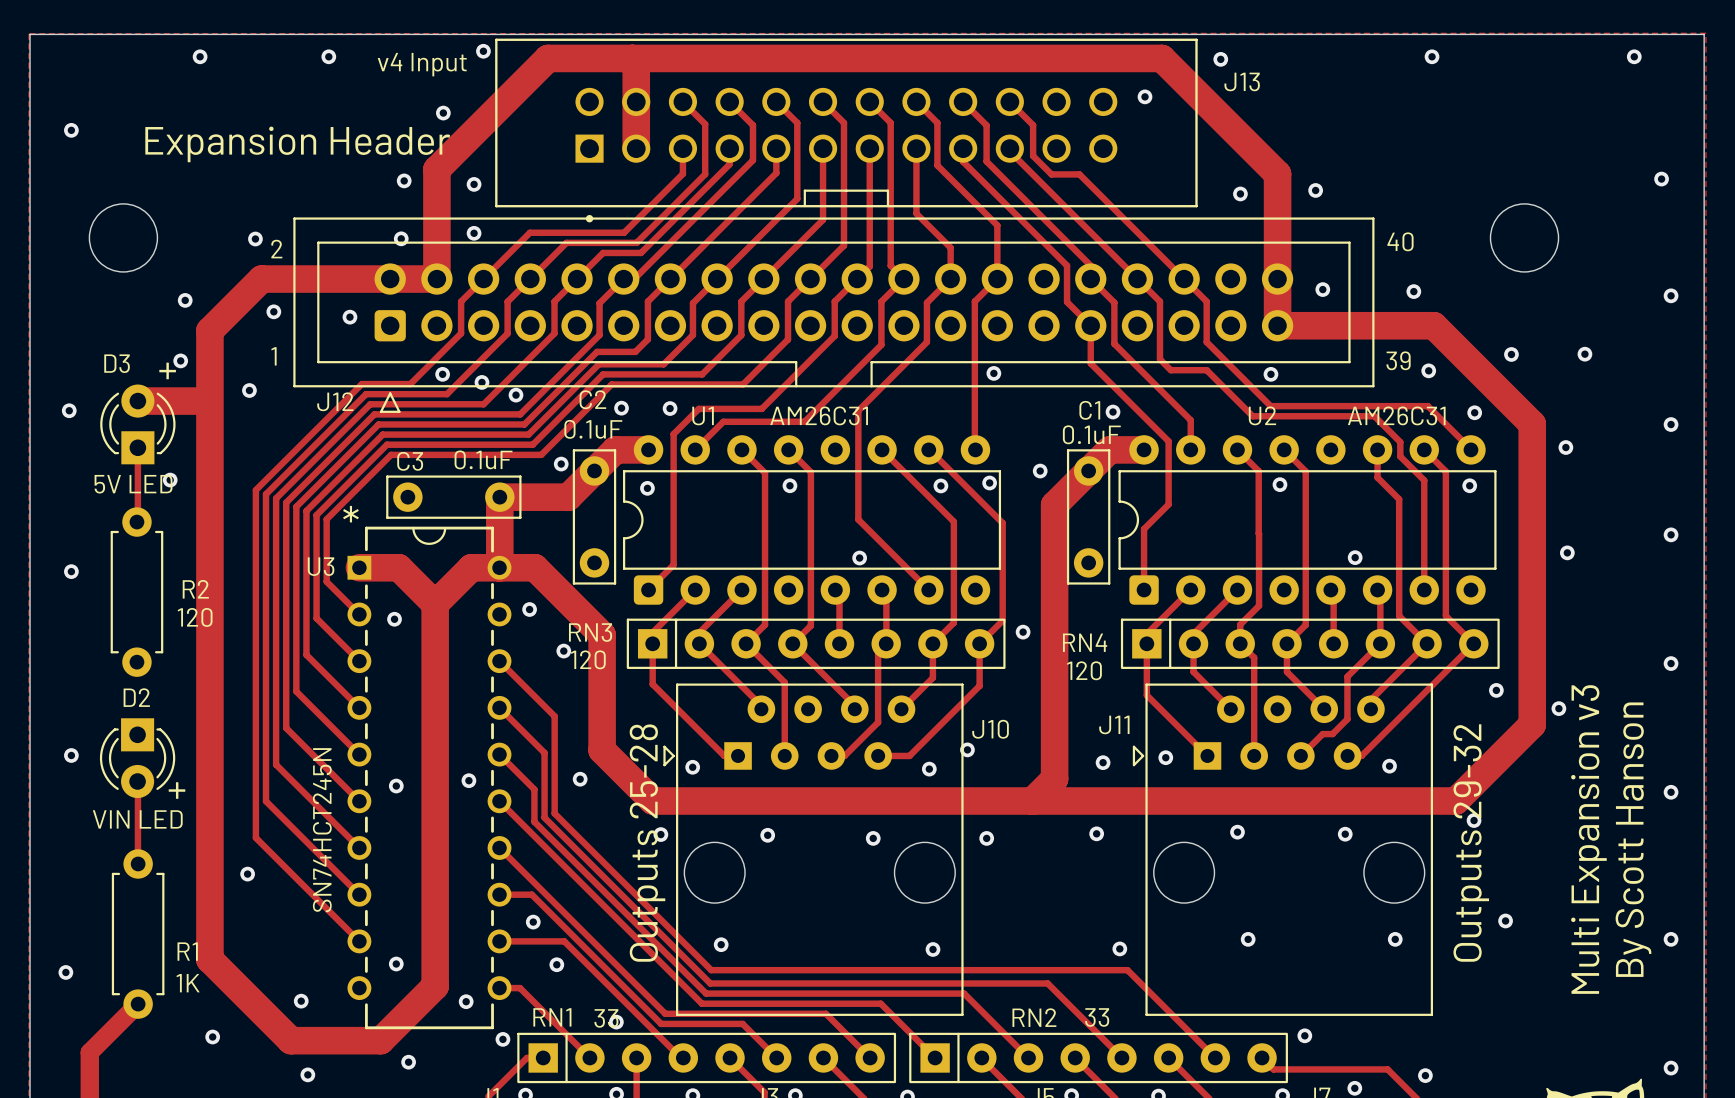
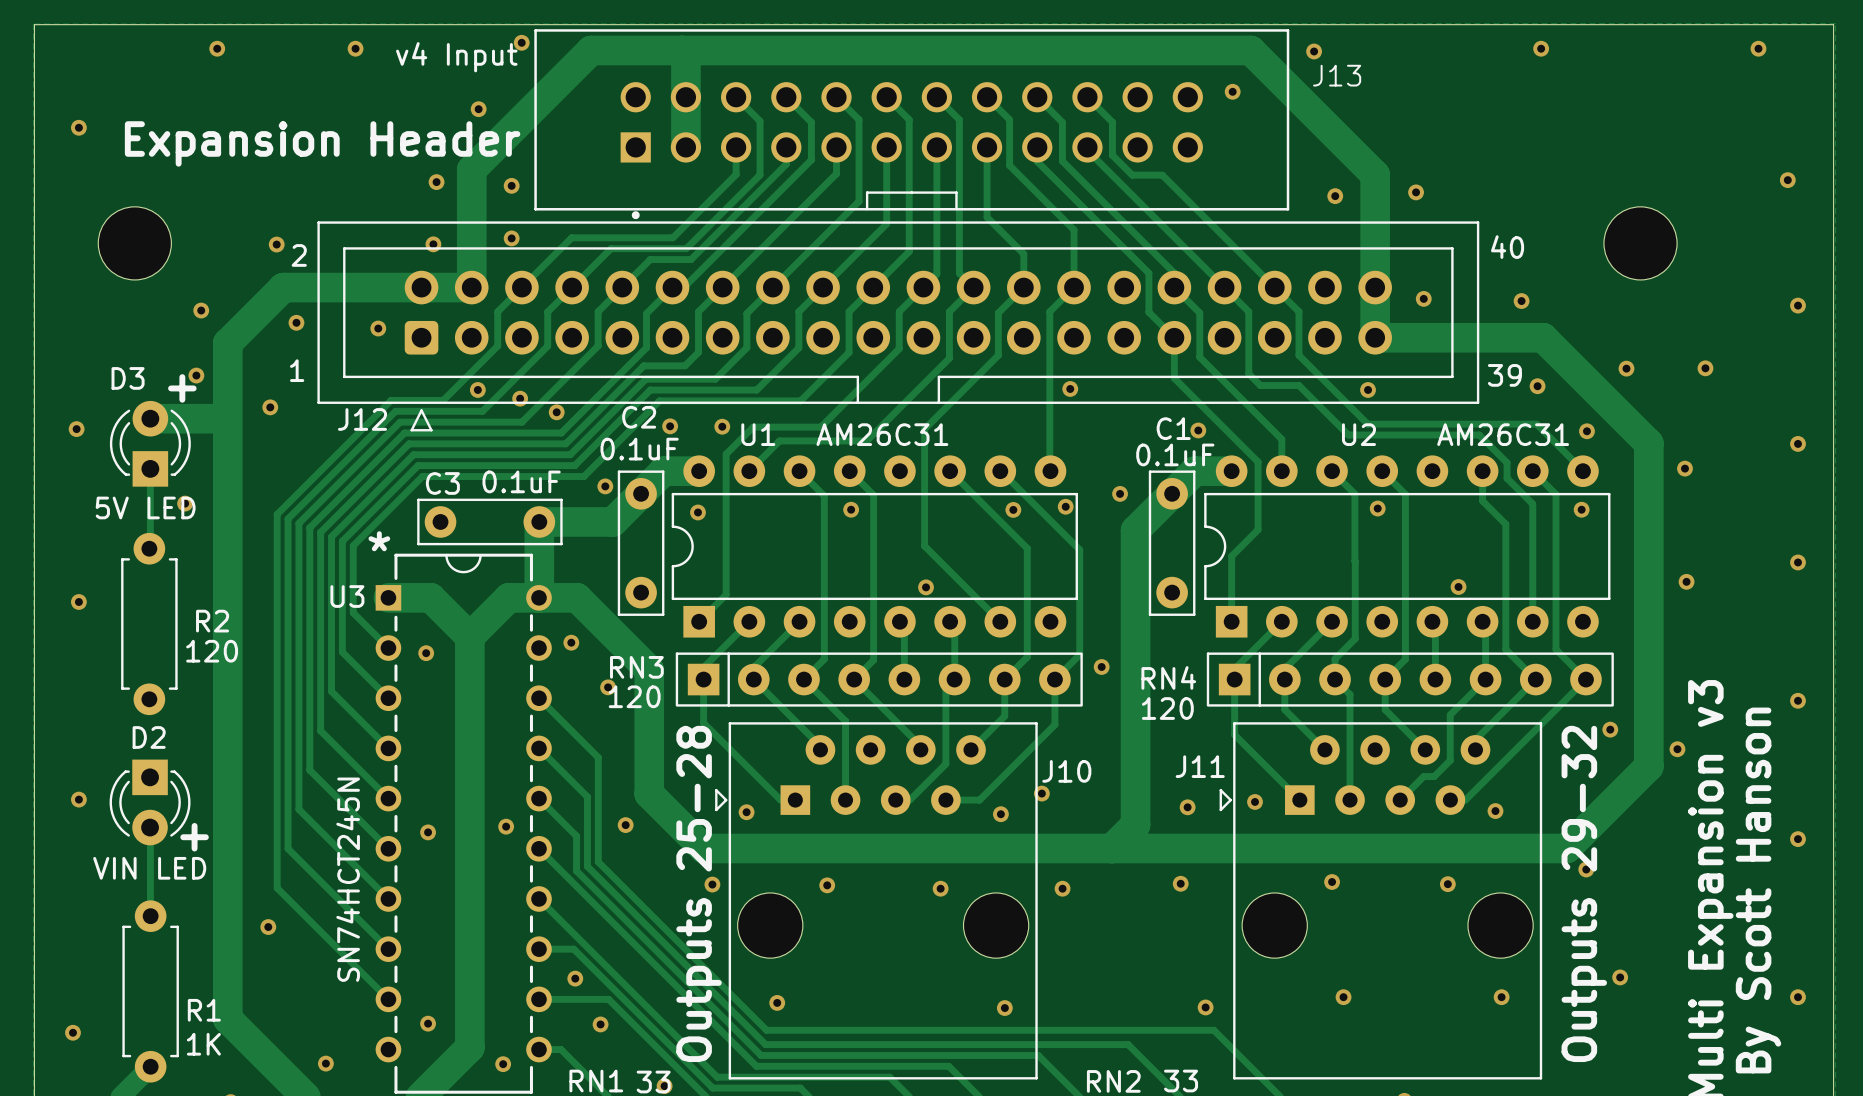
J13 footprint: [495, 38, 1198, 223] -> [534, 29, 1290, 220]
U1 footprint: [623, 435, 1002, 605] -> [671, 455, 1078, 638]
U2 footprint: [1118, 435, 1497, 605] -> [1204, 455, 1611, 638]

